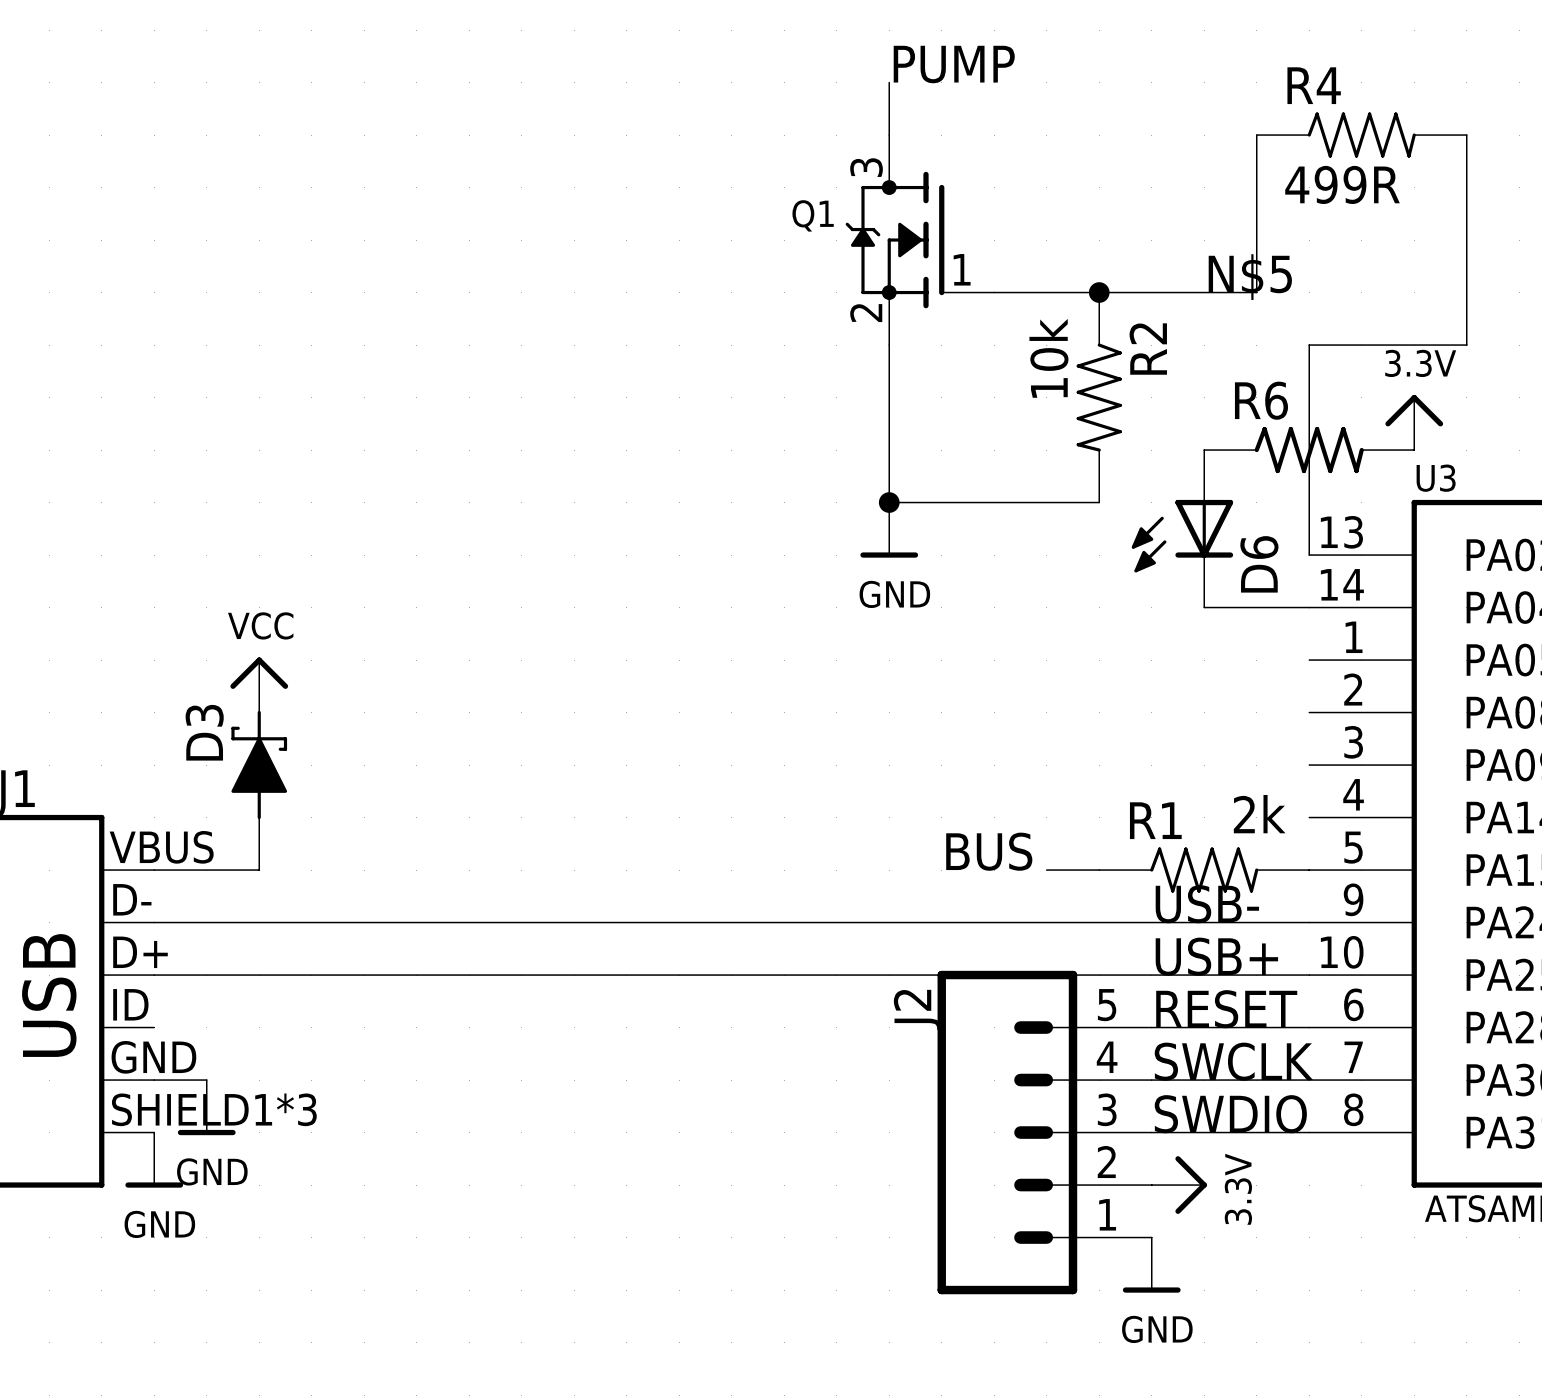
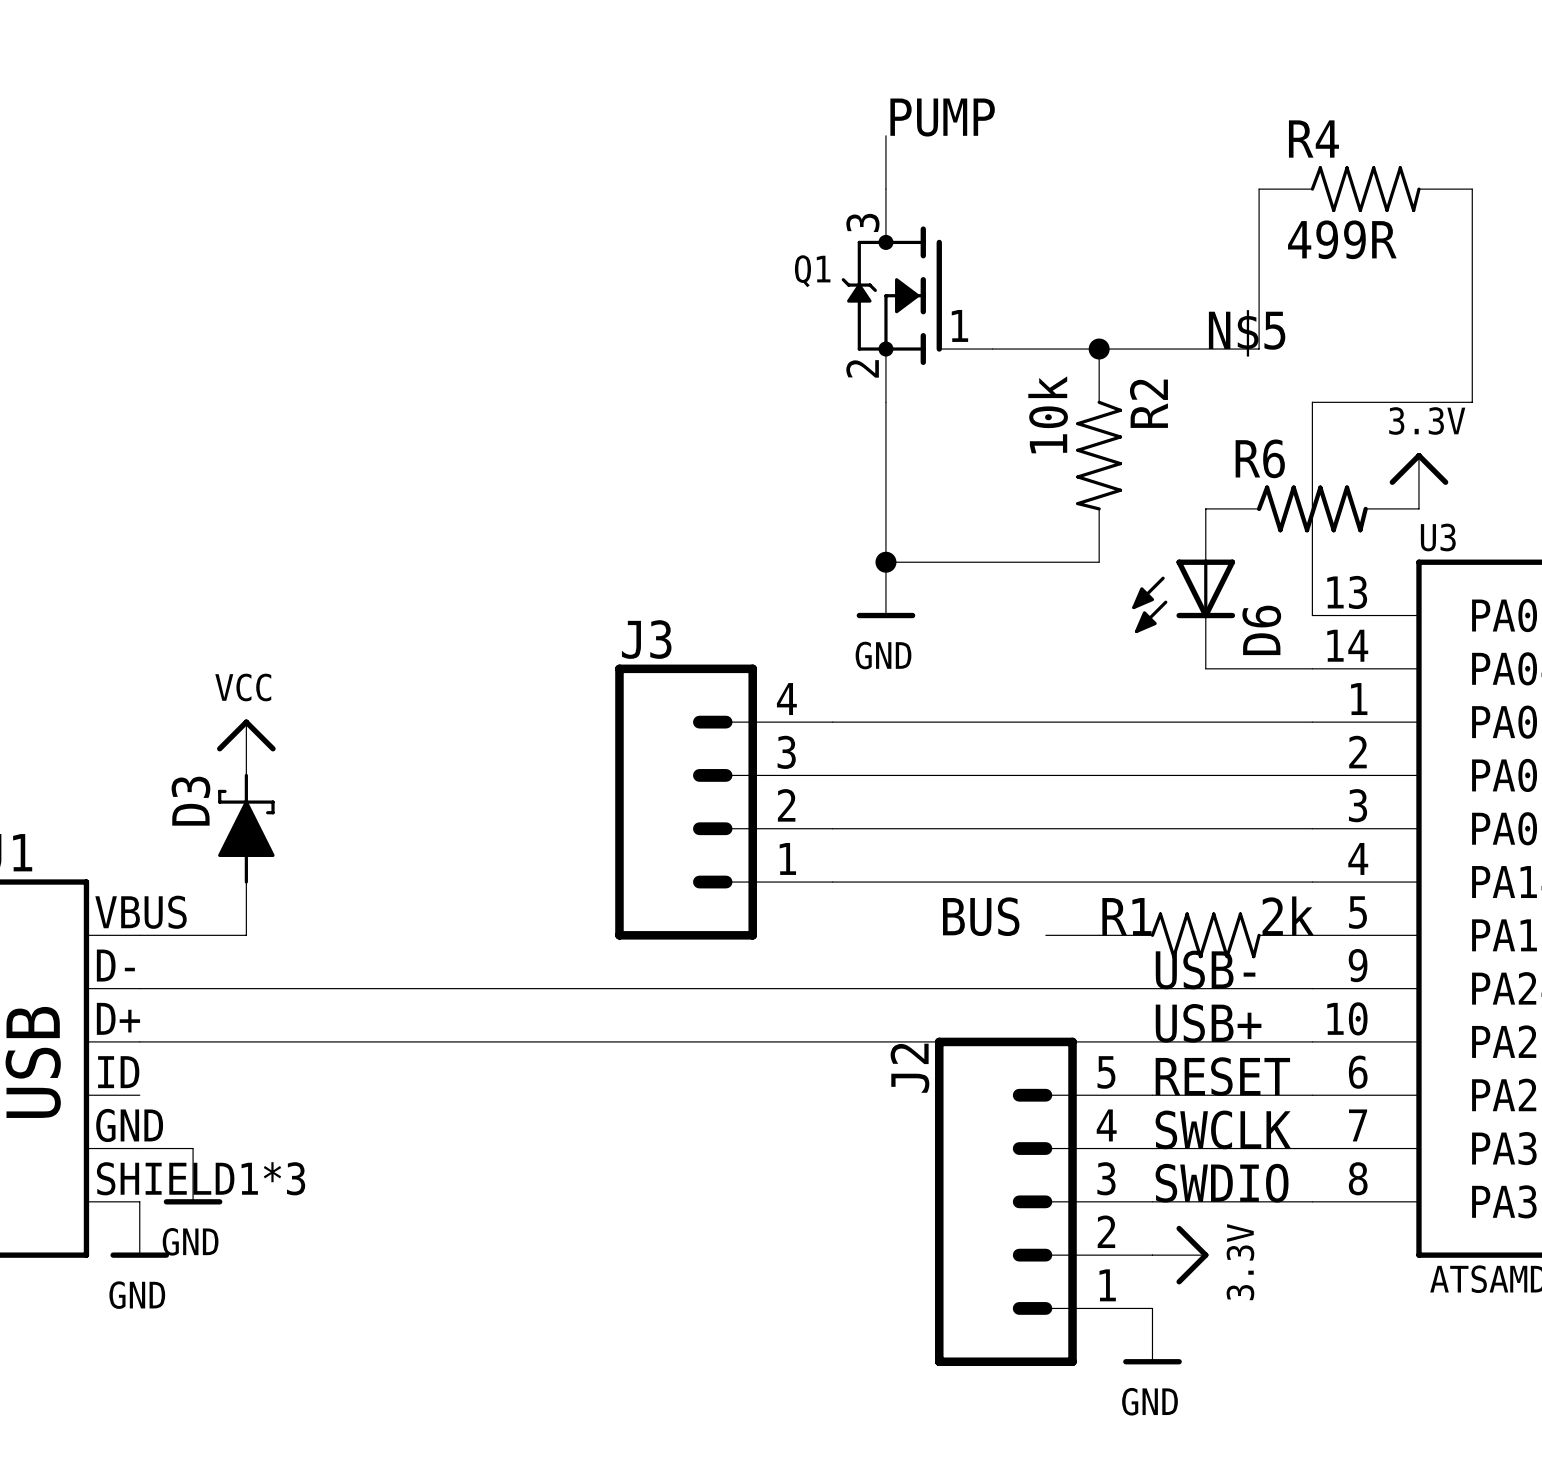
wire: none -> (832, 722) (1312, 722)
wire: none -> (832, 775) (1312, 775)
J3: none -> (723, 802)
wire: none -> (832, 828) (1312, 828)
R1 value position: 2k (1259, 814) -> 2k (1288, 915)
wire: none -> (832, 882) (1312, 882)
R1 name position: R1 (1155, 820) -> R1 (1126, 916)

